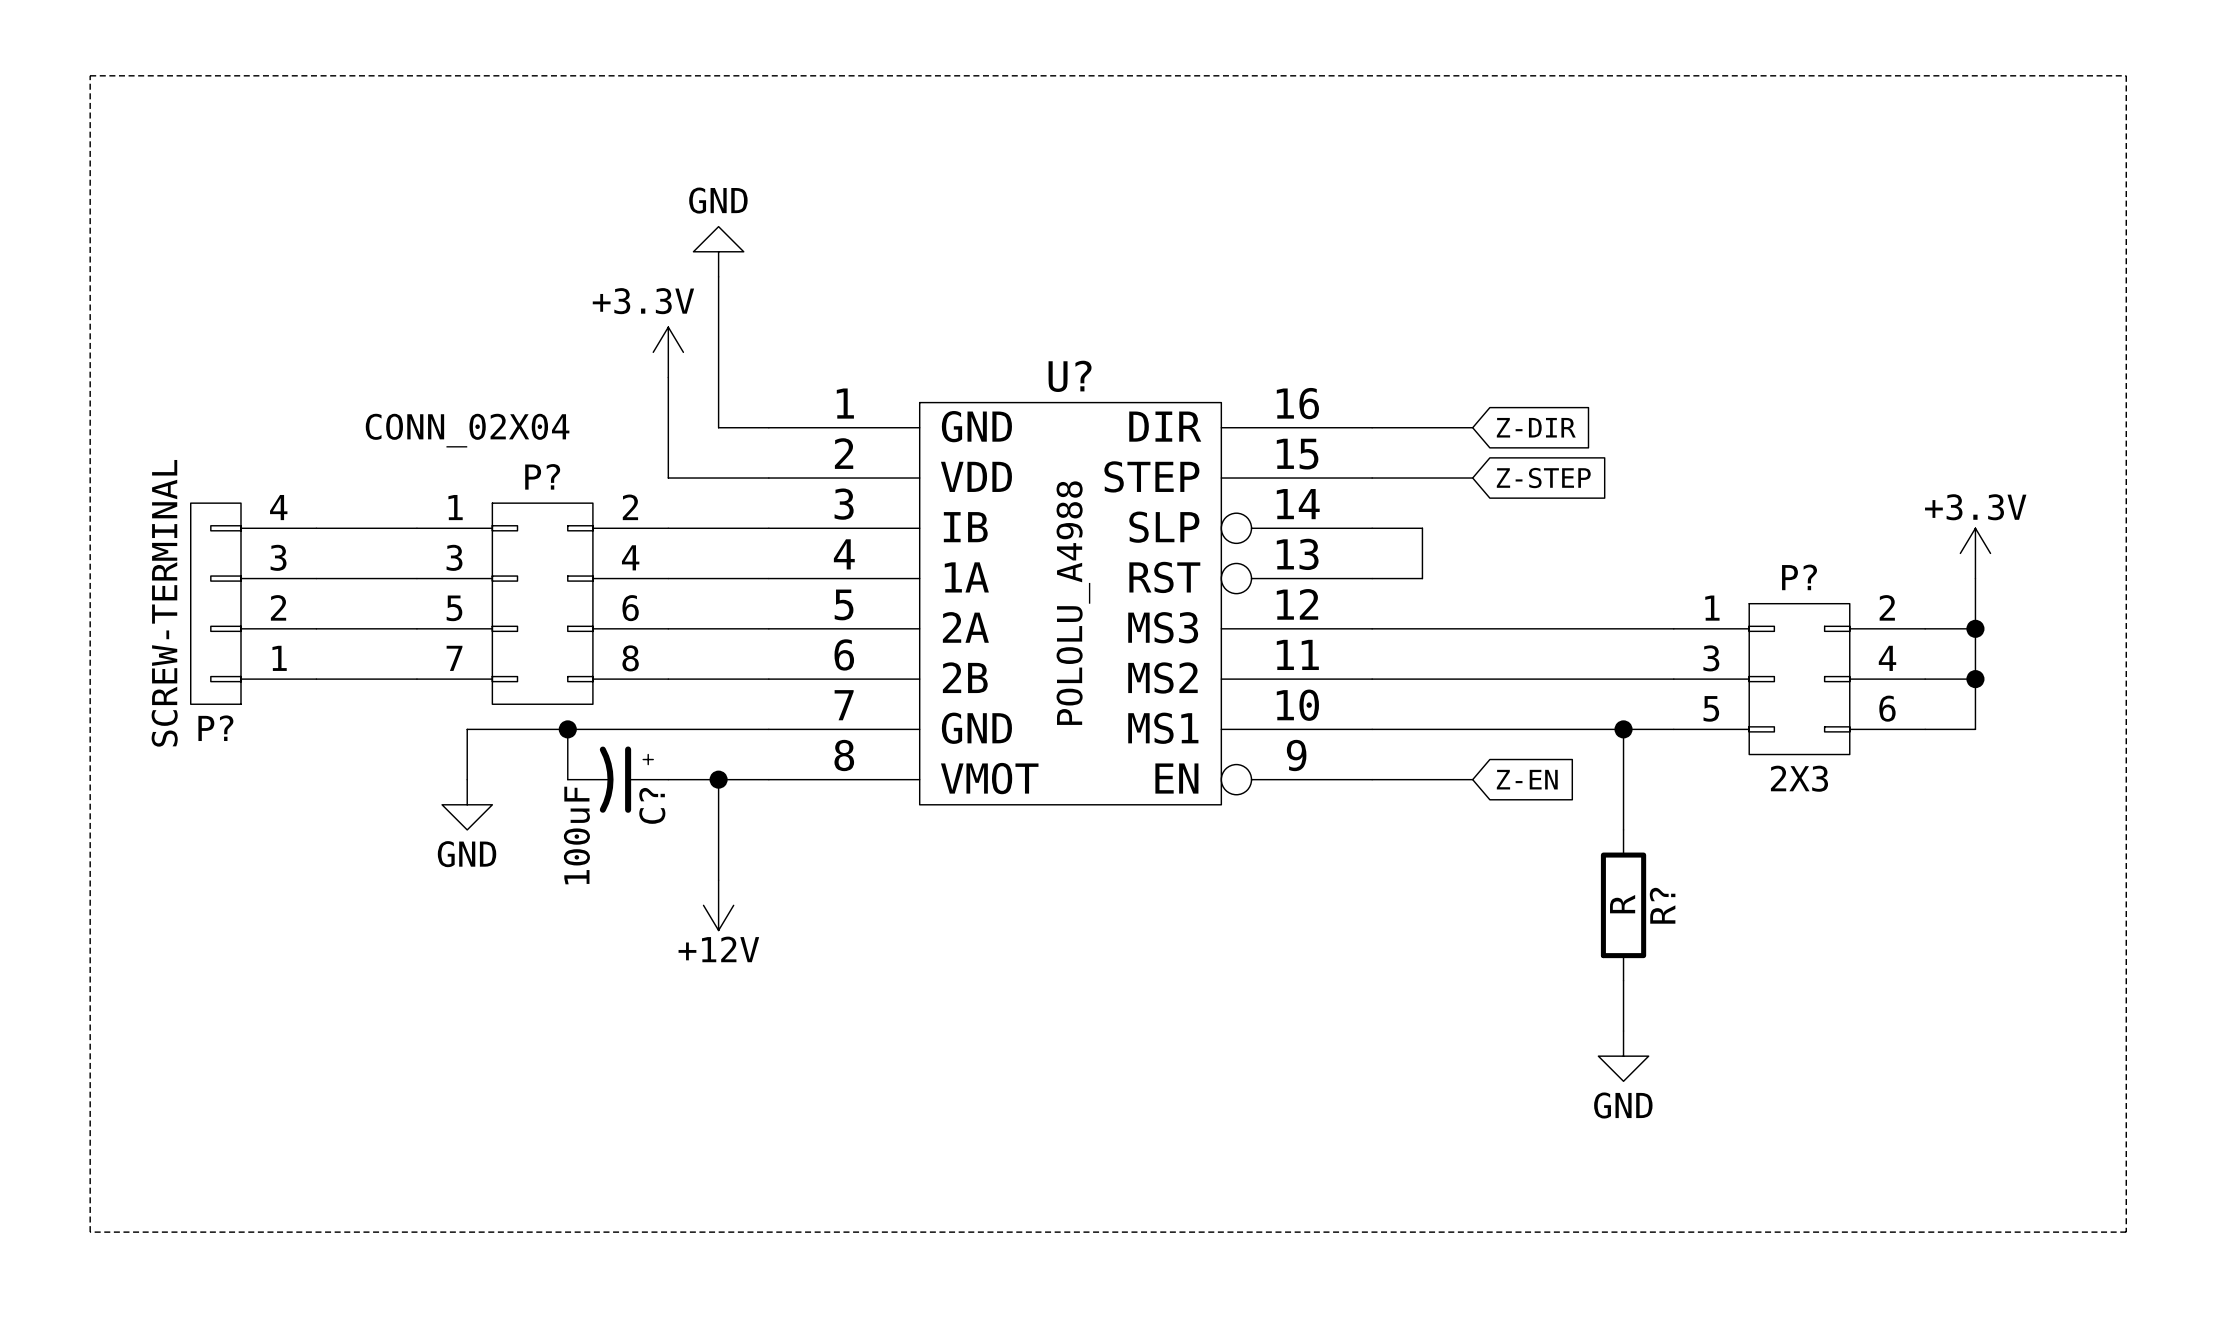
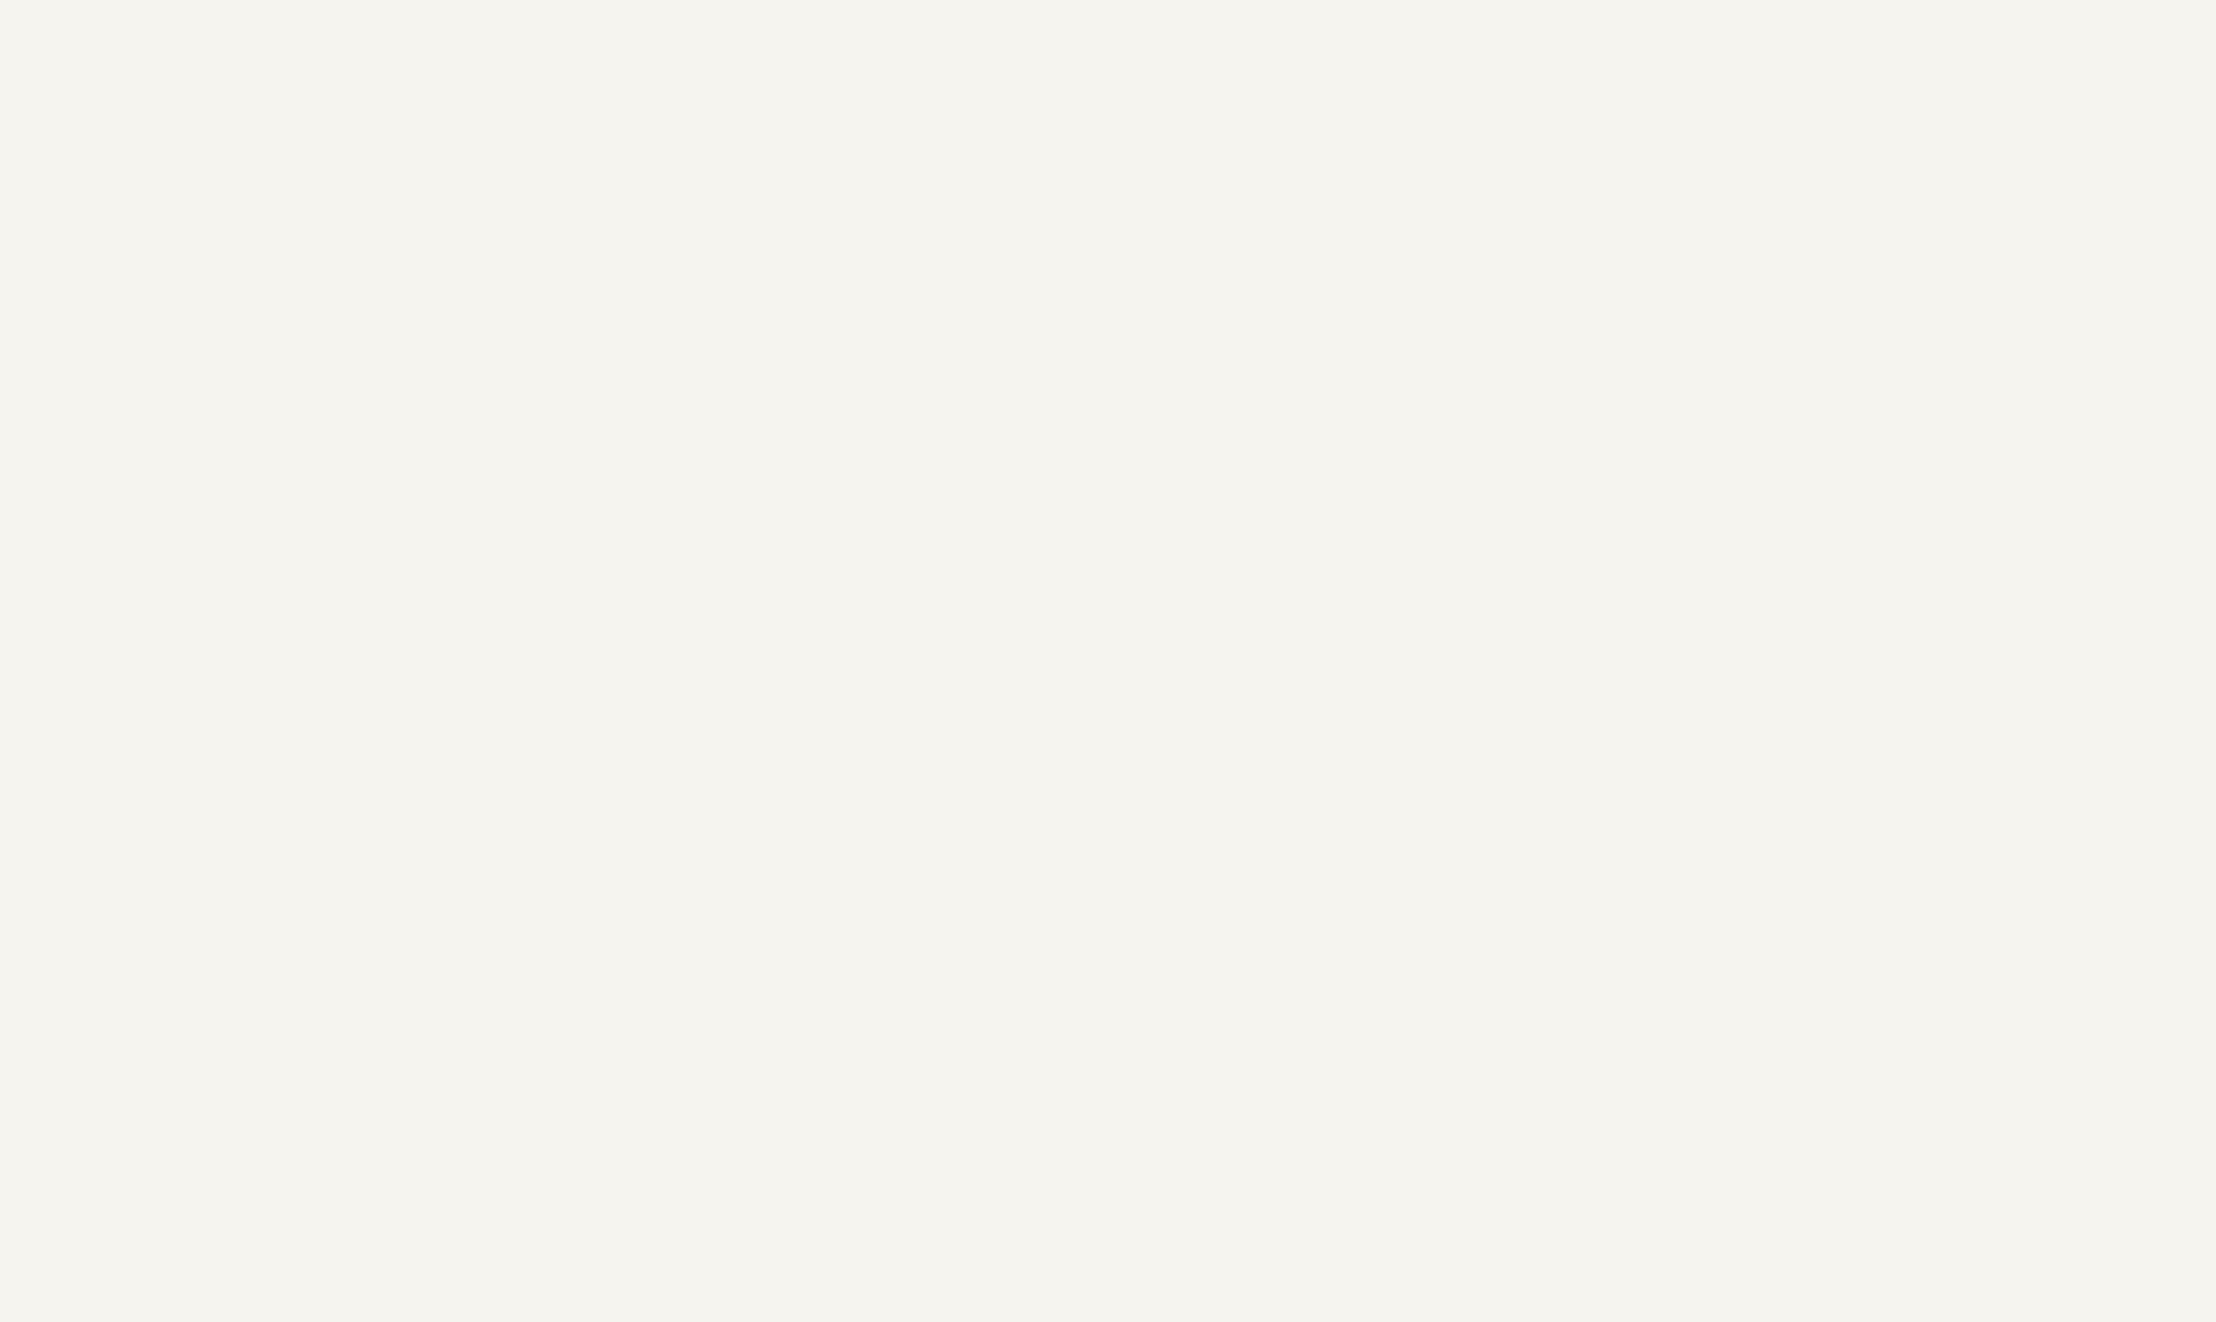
line: (90, 75) (2126, 75) (2126, 1232) (90, 1232) (90, 75) -> none
power symbol: GND (718, 251) -> none
wire: (718, 276) (718, 427) (768, 427) -> none
power symbol: +3.3V (668, 352) -> none
wire: (668, 377) (668, 478) (768, 478) -> none
wire: (1372, 427) (1472, 427) -> none
global label: Z-DIR (1536, 427) -> none
wire: (1372, 478) (1472, 478) -> none
global label: Z-STEP (1543, 478) -> none
wire: (316, 528) (416, 528) -> none
wire: (668, 528) (768, 528) -> none
wire: (1372, 528) (1422, 528) (1422, 578) (1372, 578) -> none
power symbol: +3.3V (1975, 553) -> none
wire: (316, 578) (416, 578) -> none
wire: (668, 578) (768, 578) -> none
wire: (1975, 578) (1975, 729) (1925, 729) -> none
P?: SCREW-TERMINAL (253, 603) -> none
P?: CONN_02X04 (542, 603) -> none
U?: POLOLU_A4988 (1070, 603) -> none
wire: (316, 628) (416, 628) -> none
wire: (668, 628) (768, 628) -> none
wire: (1372, 628) (1673, 628) -> none
wire: (1925, 628) (1975, 628) -> none
junction: (1975, 628) -> none
wire: (316, 679) (416, 679) -> none
wire: (668, 679) (768, 679) -> none
wire: (1372, 679) (1673, 679) -> none
P?: 2X3 (1799, 679) -> none
wire: (1925, 679) (1975, 679) -> none
junction: (1975, 679) -> none
wire: (567, 729) (567, 779) -> none
junction: (567, 729) -> none
wire: (768, 729) (467, 729) (467, 779) -> none
wire: (1372, 729) (1673, 729) -> none
wire: (1623, 729) (1623, 829) -> none
junction: (1623, 729) -> none
C?: 100uF (618, 779) -> none
wire: (668, 779) (768, 779) -> none
wire: (718, 779) (718, 880) -> none
junction: (718, 779) -> none
wire: (1372, 779) (1472, 779) -> none
global label: Z-EN (1527, 779) -> none
power symbol: GND (467, 804) -> none
power symbol: +12V (718, 905) -> none
R?: R (1623, 905) -> none
wire: (1623, 980) (1623, 1031) -> none
power symbol: GND (1623, 1056) -> none

